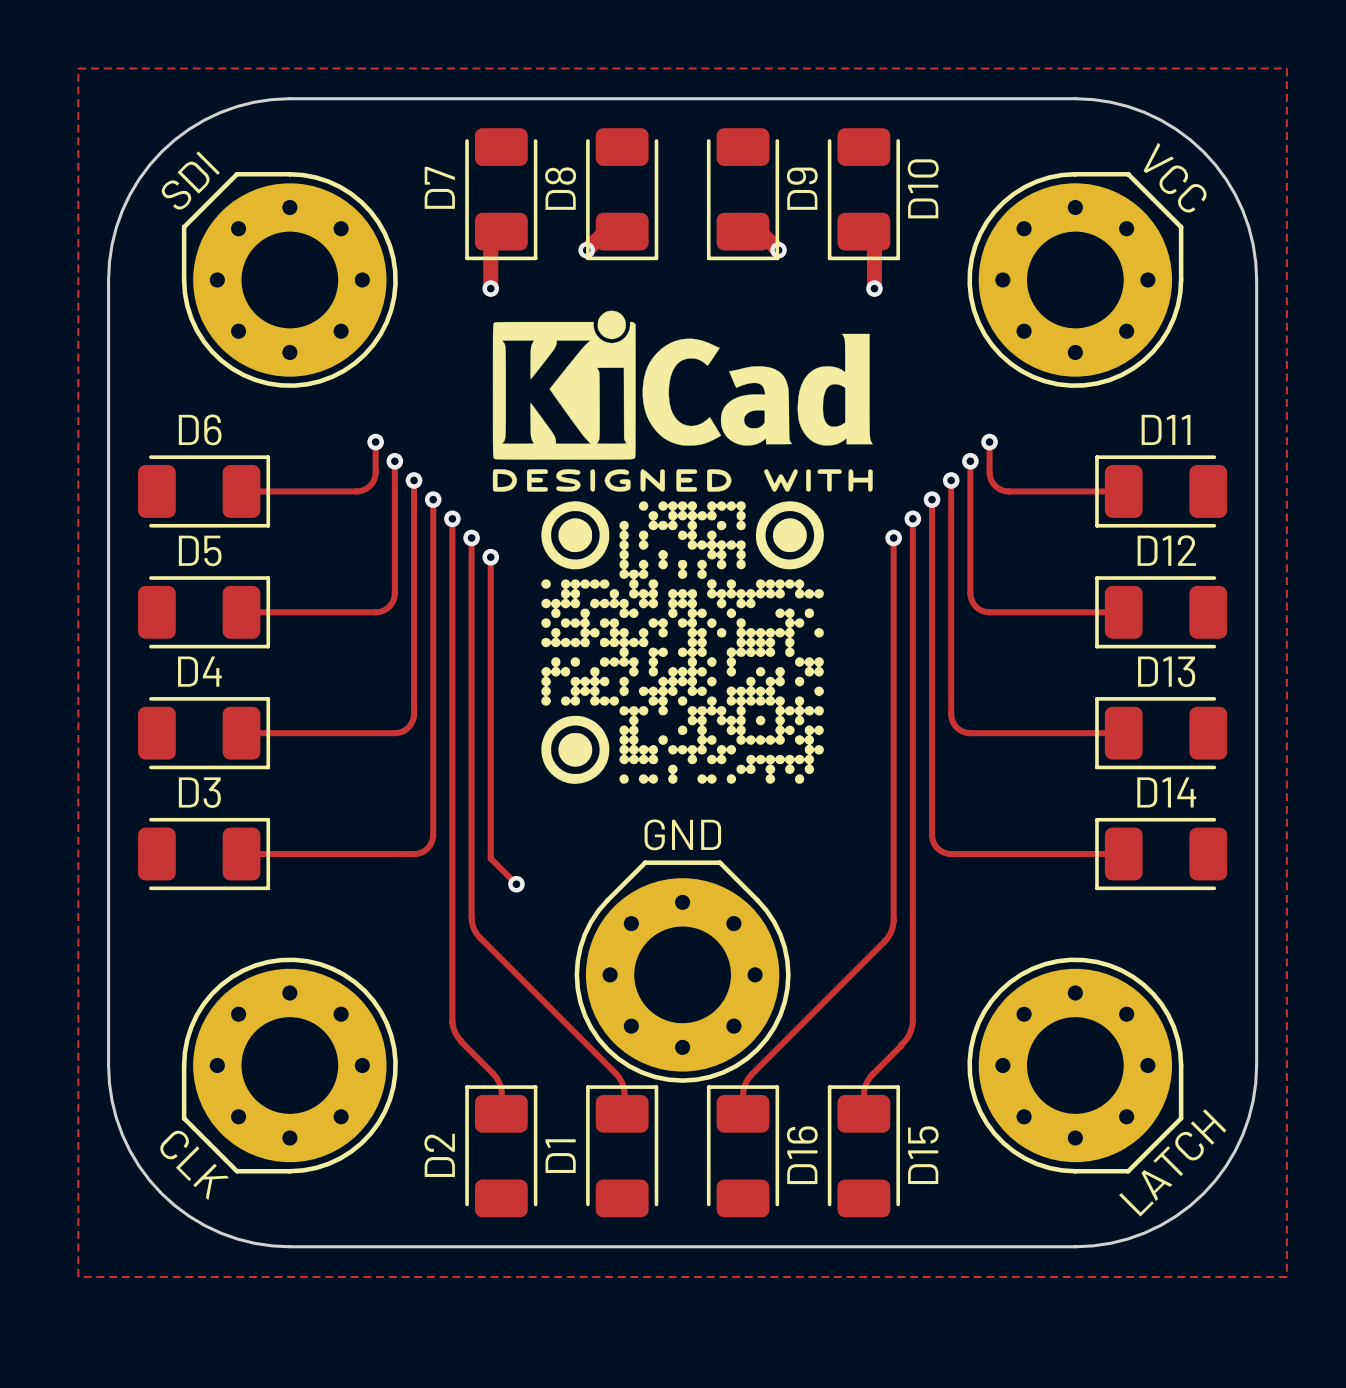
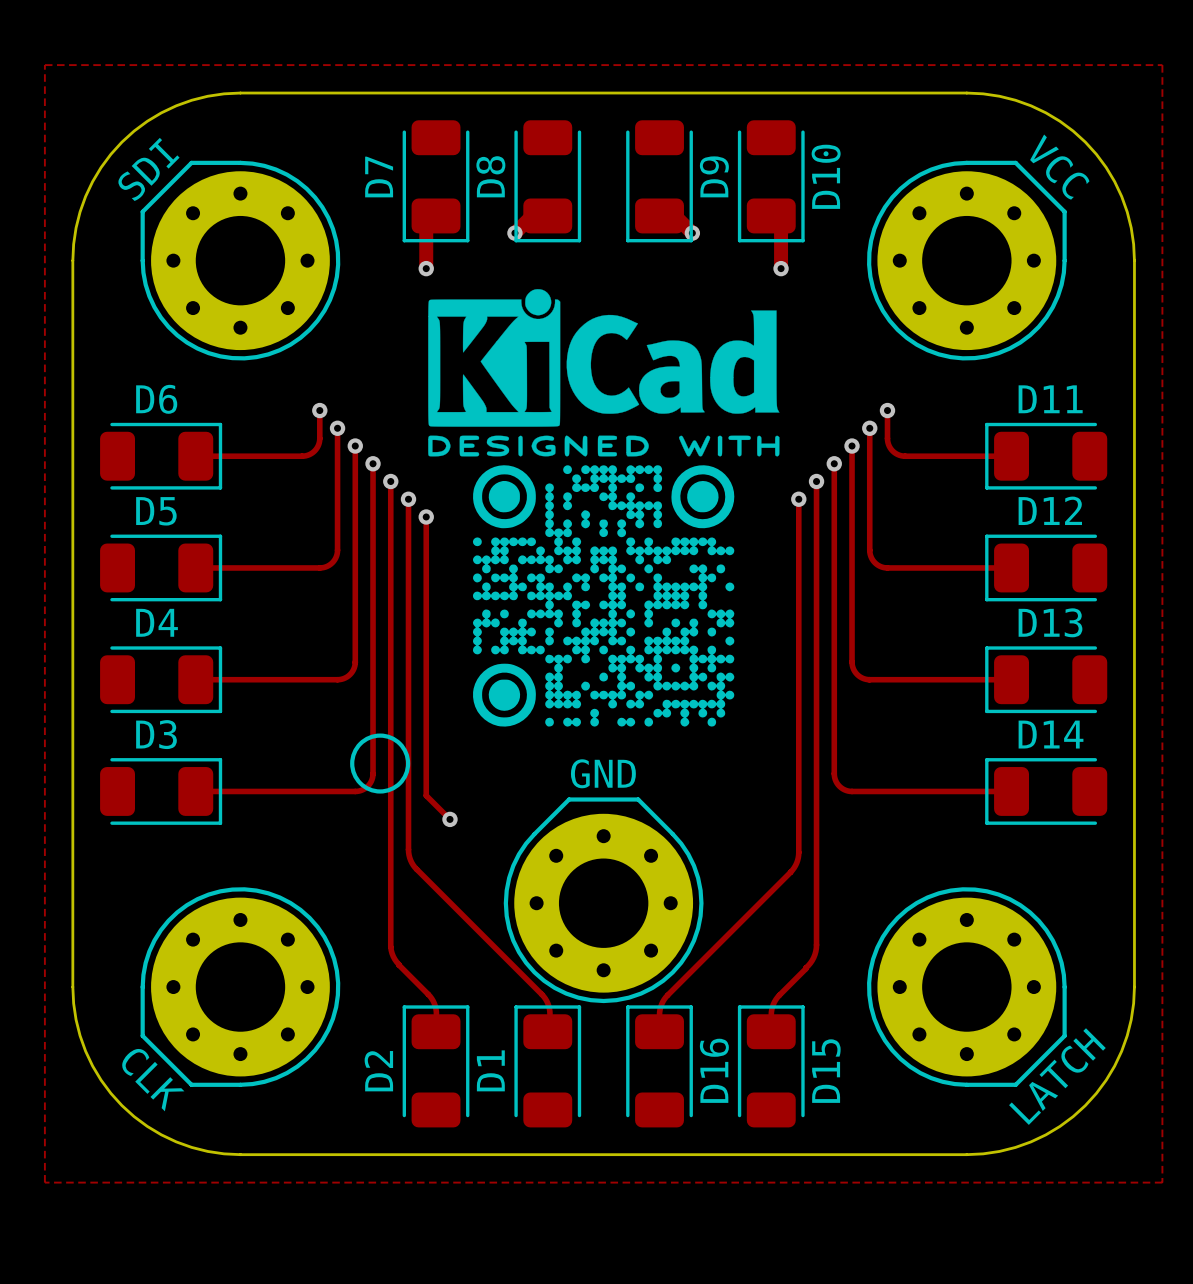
drawing: none -> [350, 733, 411, 794]

